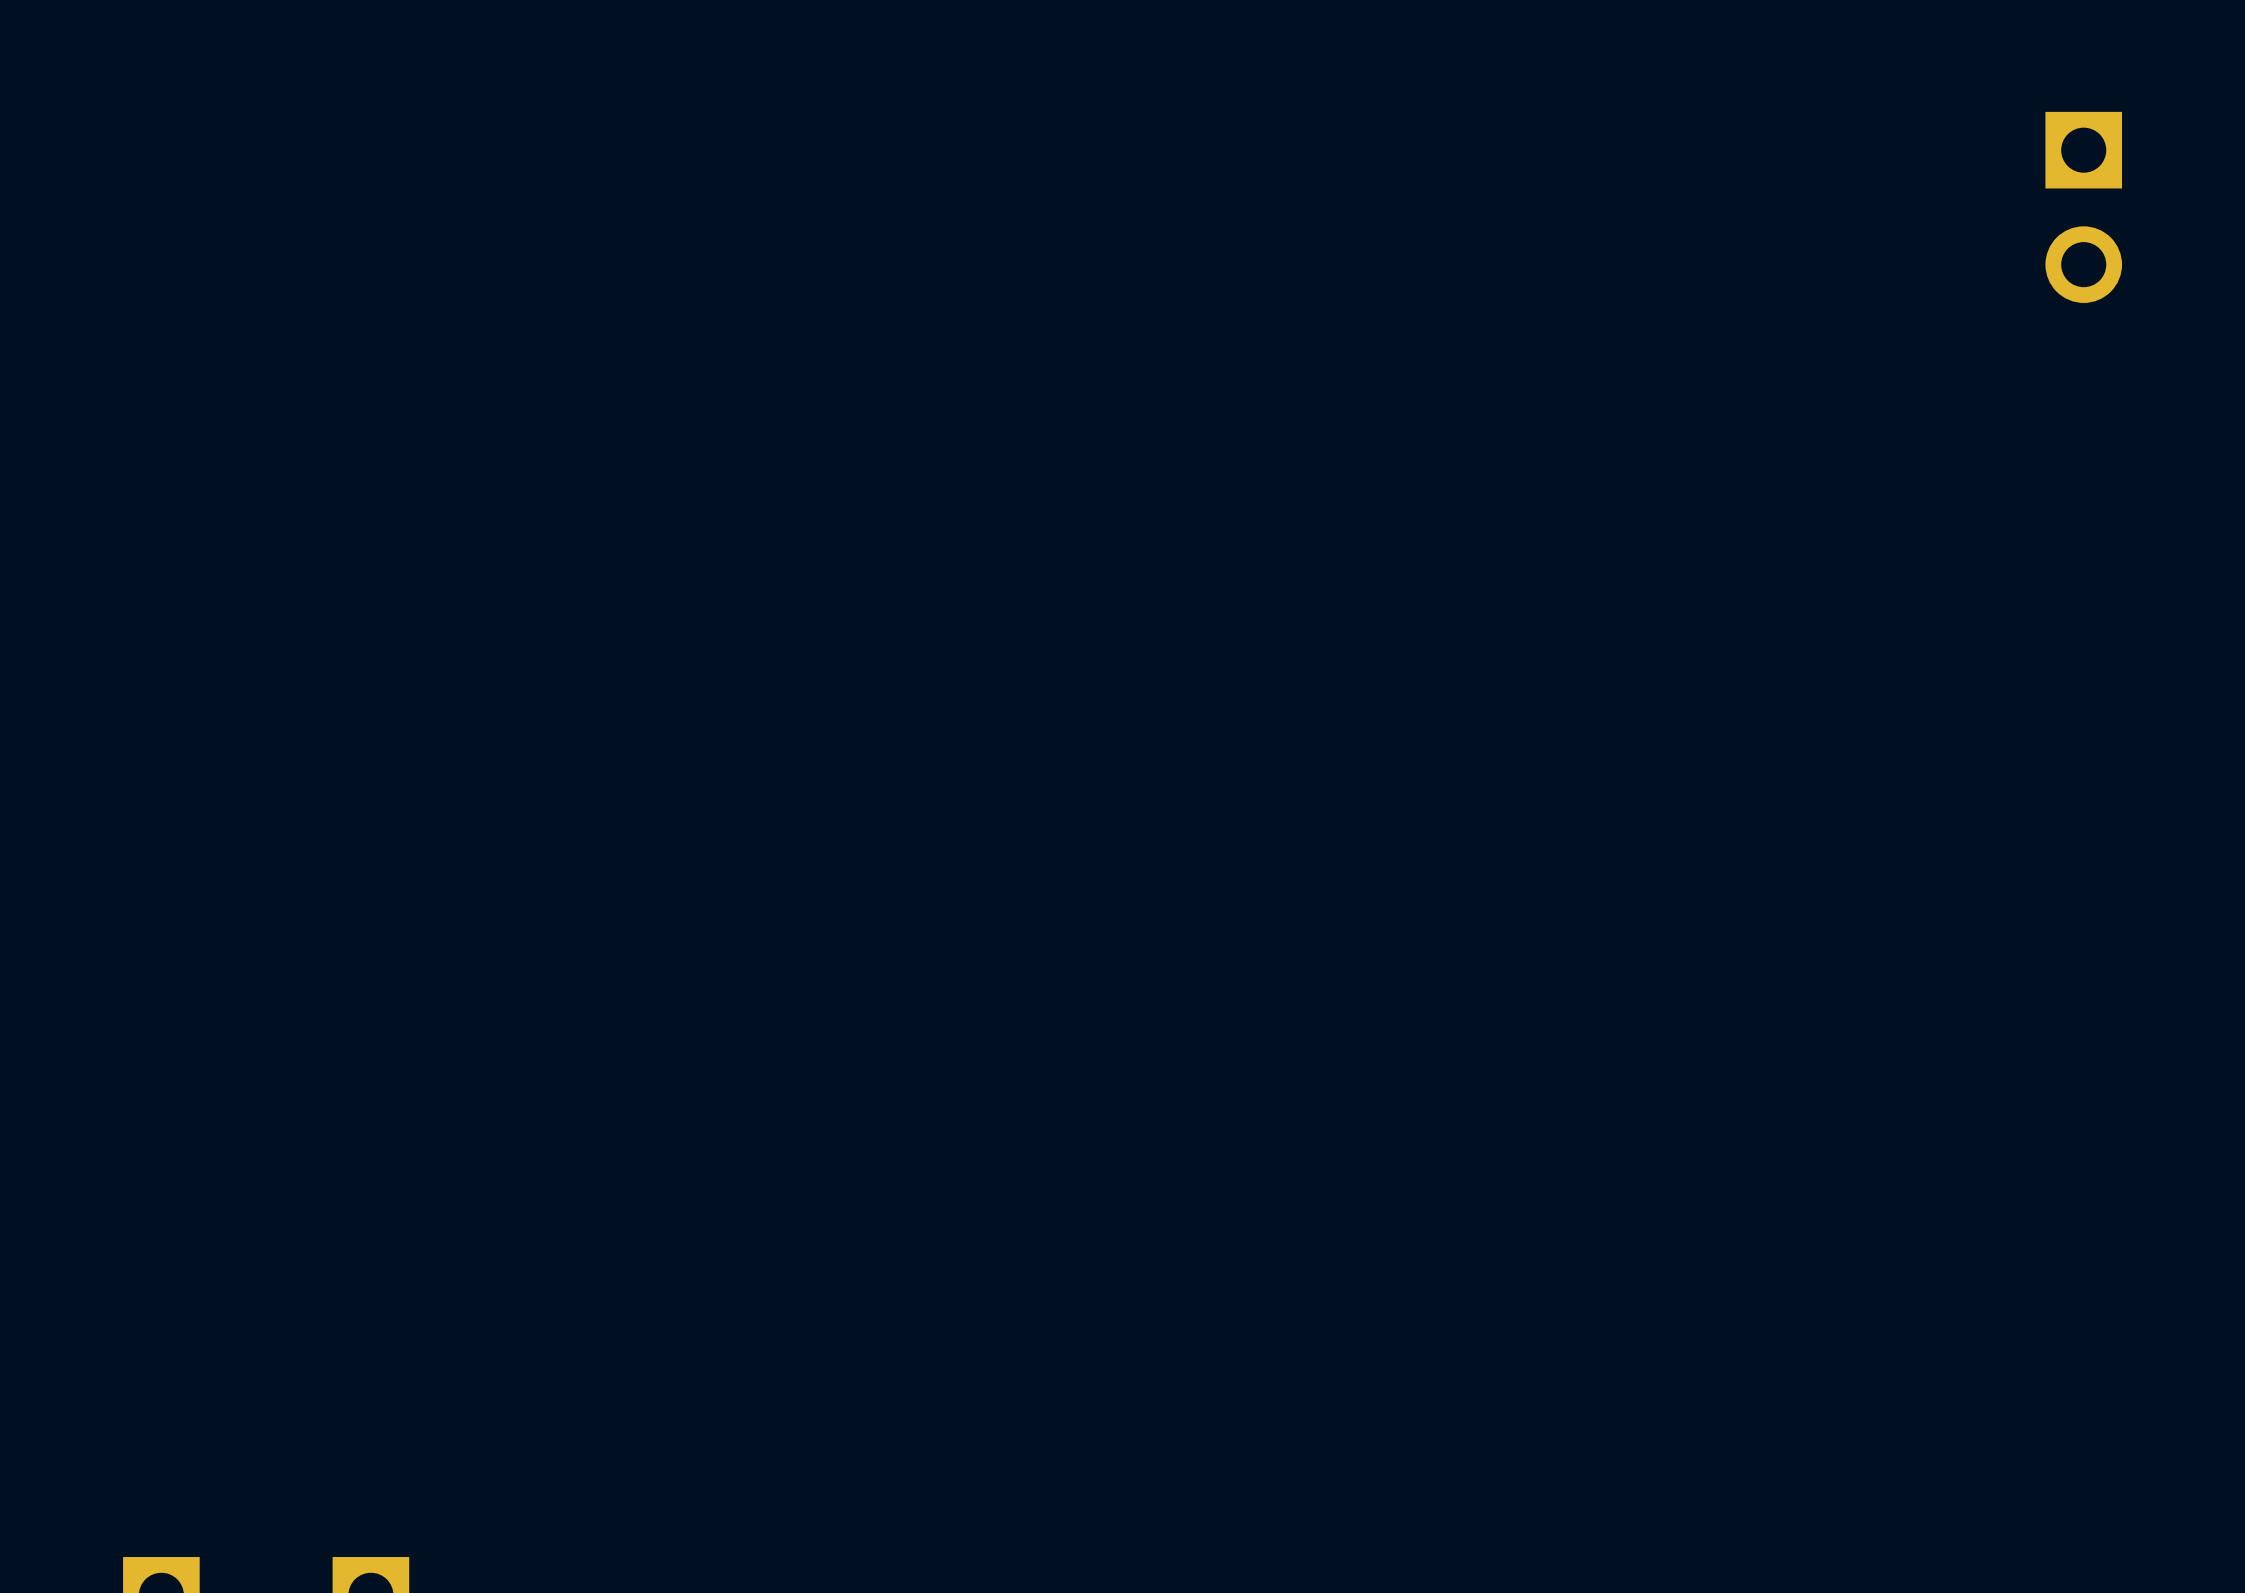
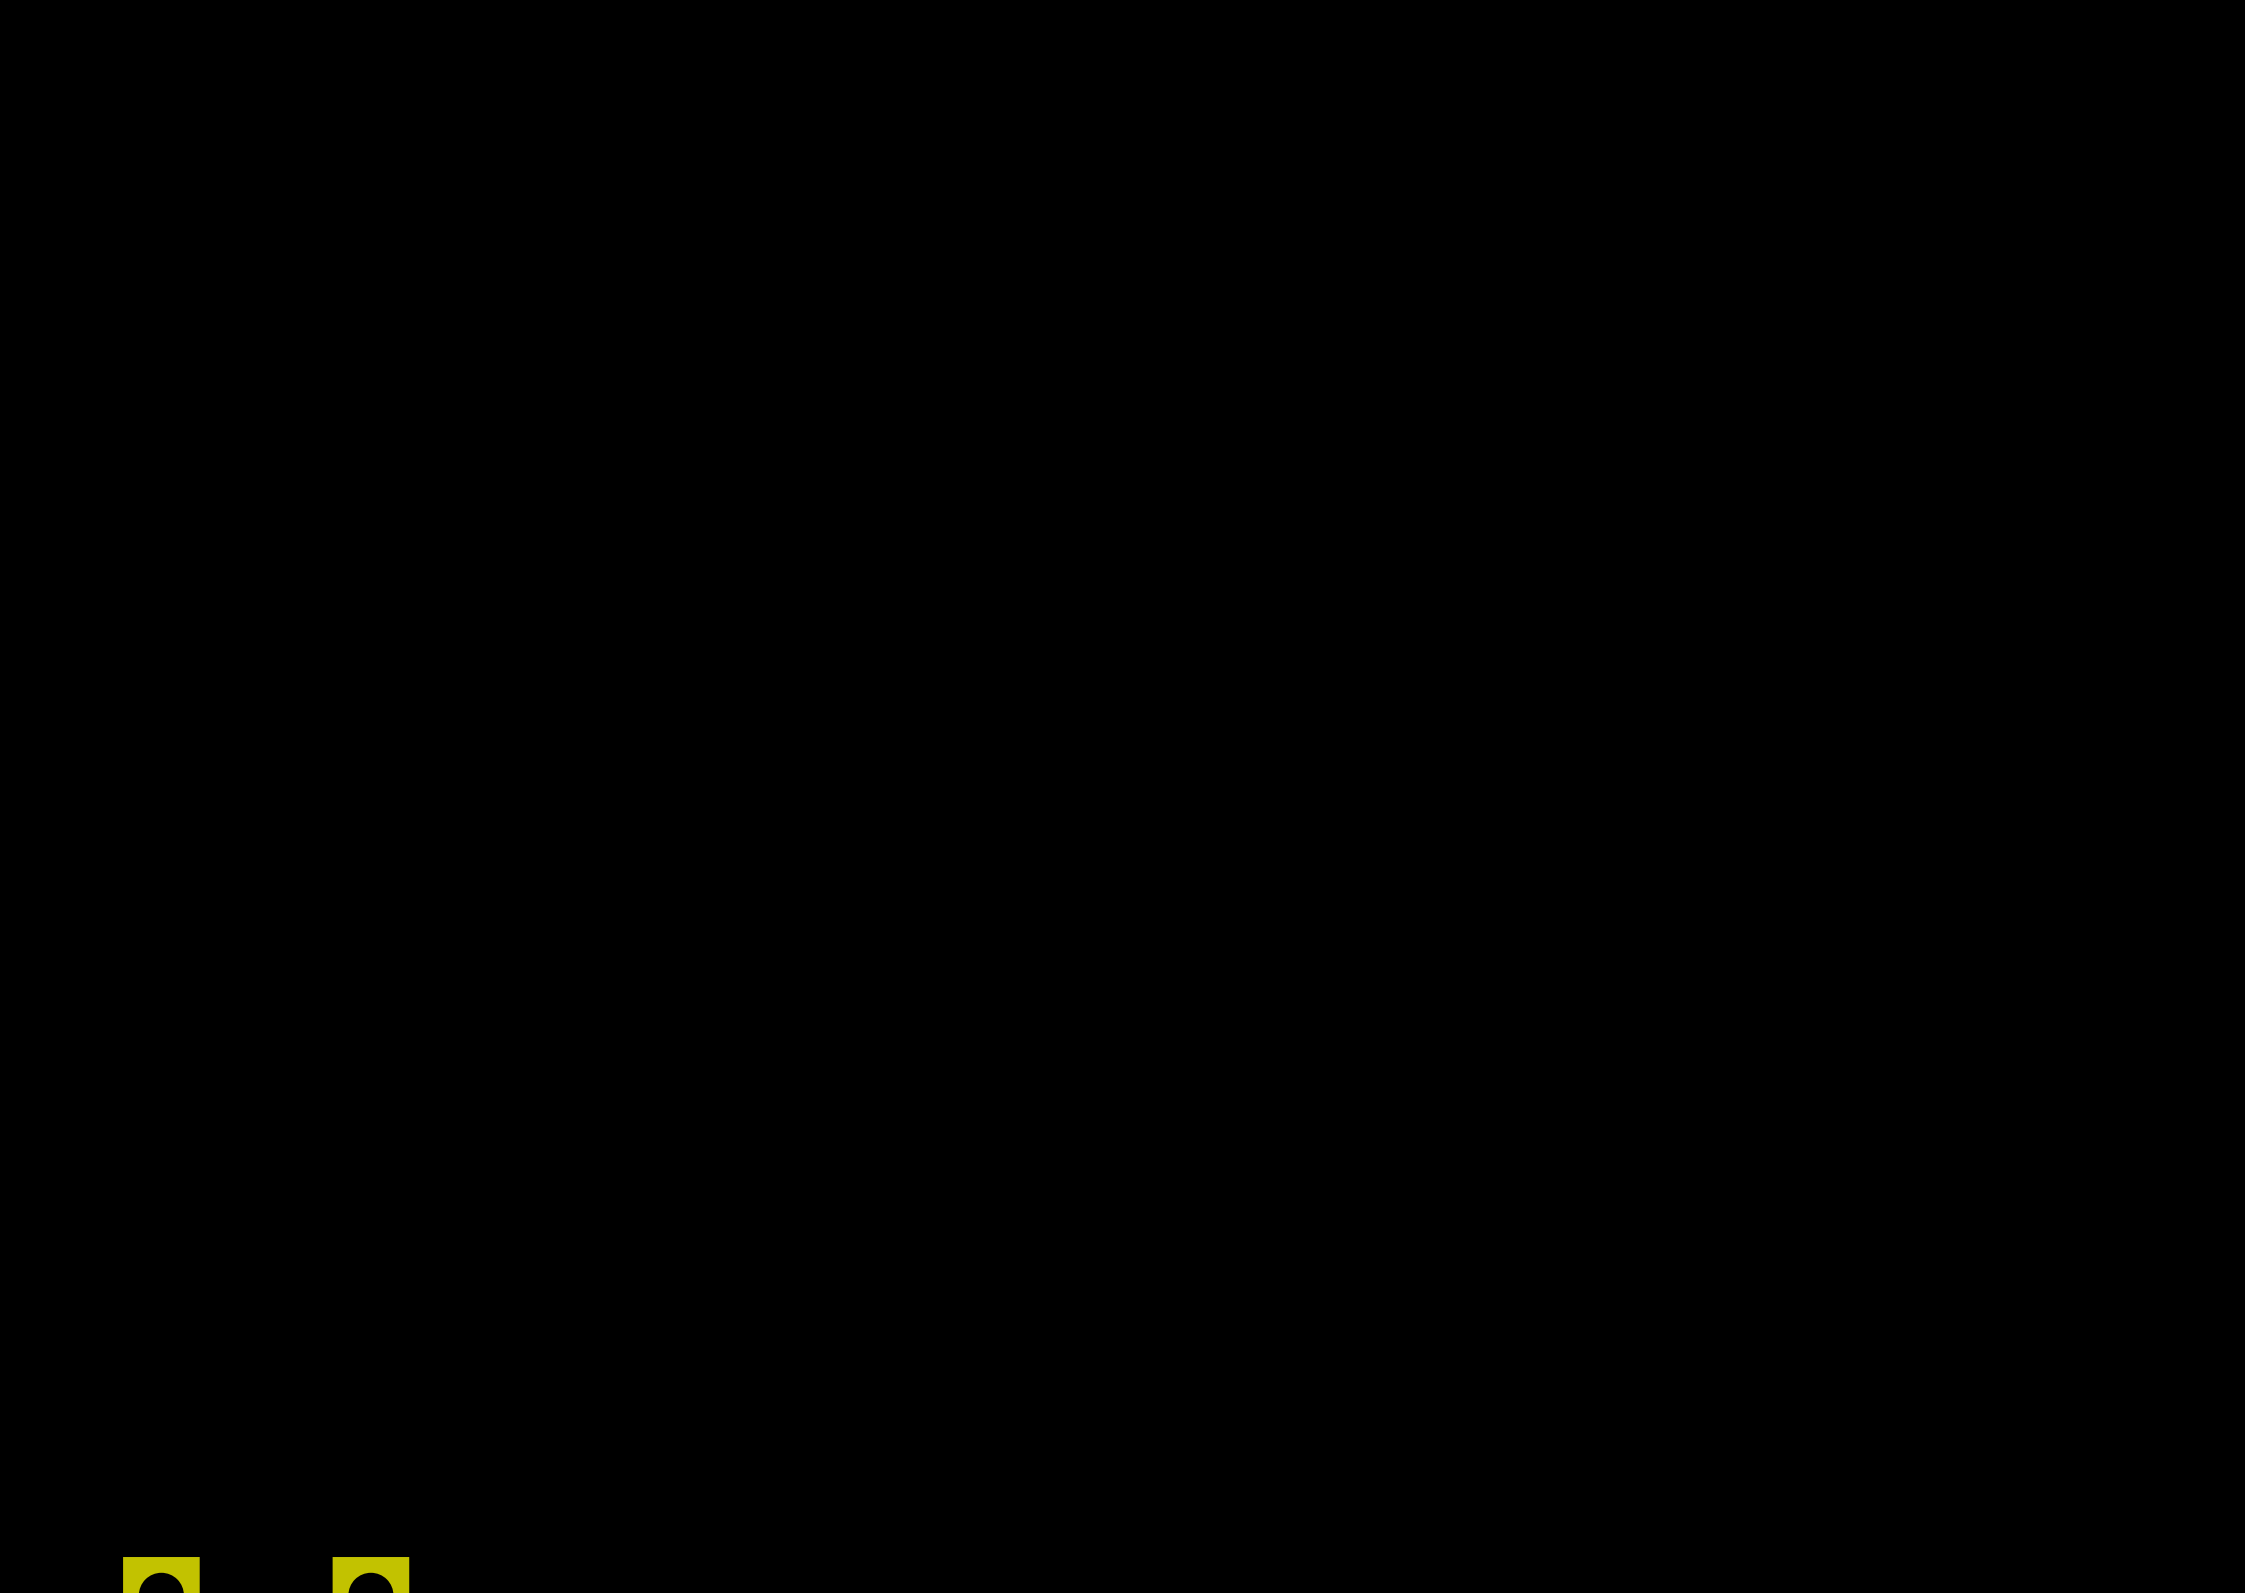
part: (2083, 207) -> none

